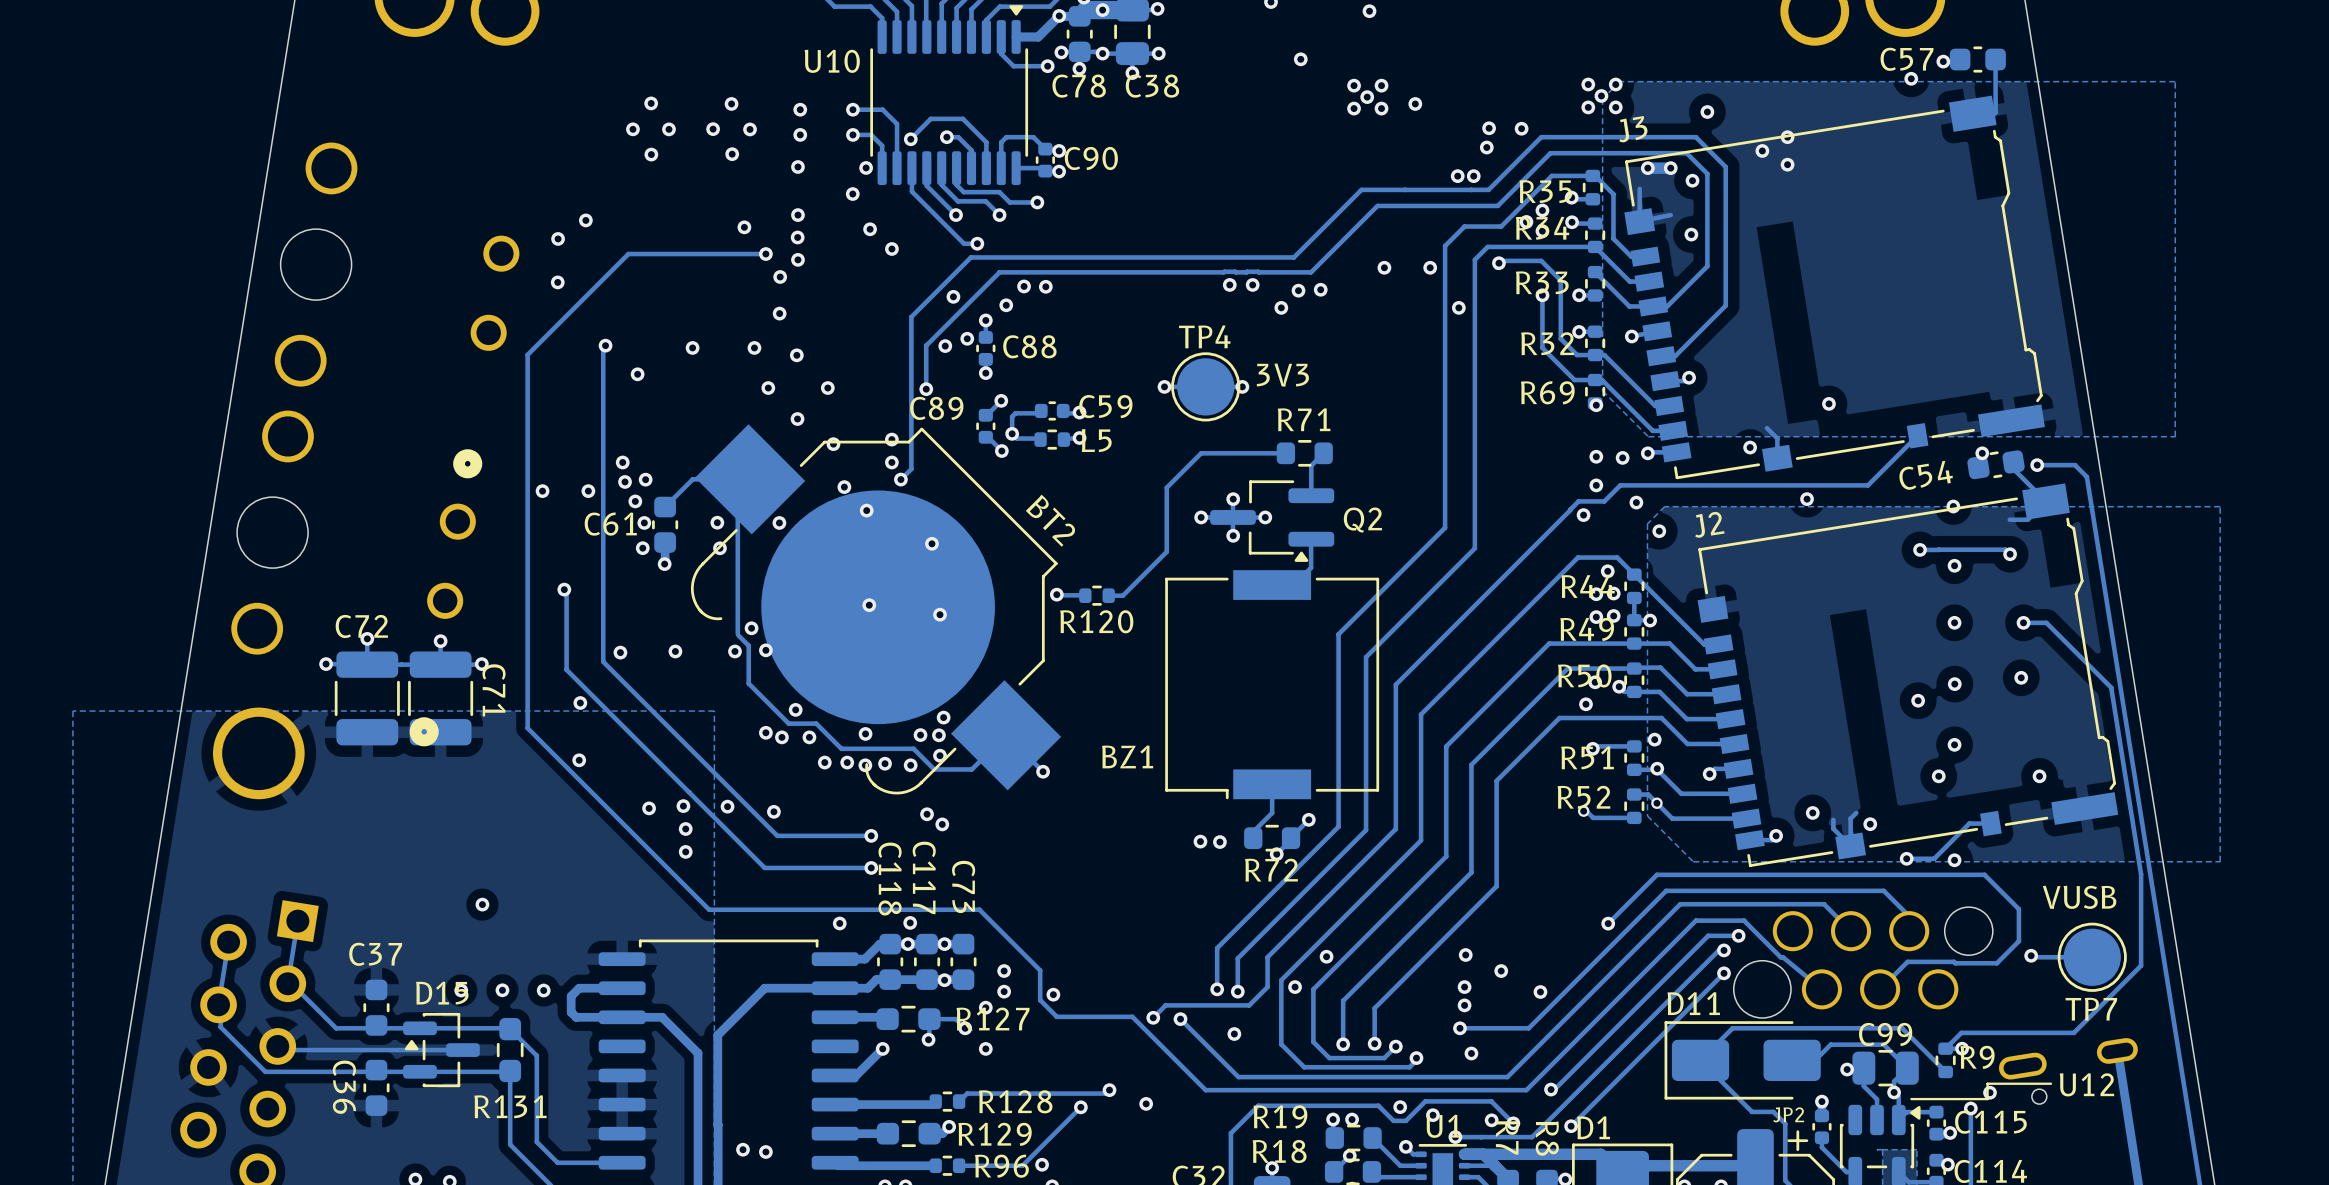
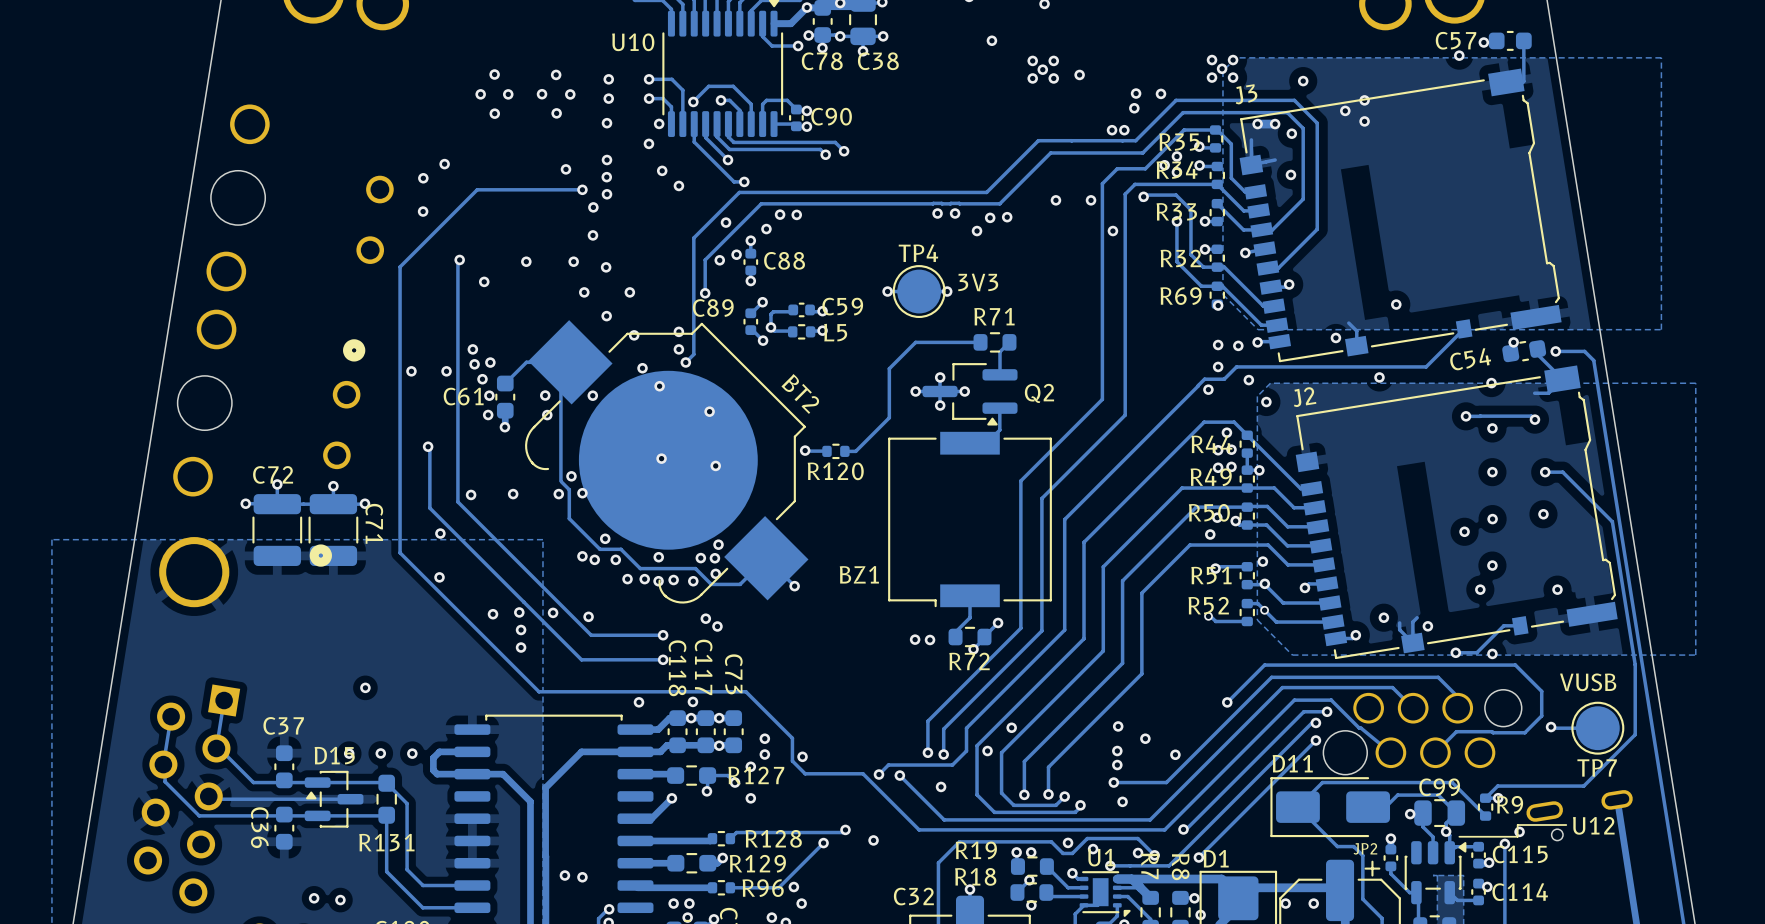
track: (999, 192) (1009, 202) (1037, 202) -> (761, 142) (835, 142) (844, 151)
track: (985, 201) (999, 215) -> (750, 149) (820, 149) (825, 154)
via: (1037, 202) -> none
via: none -> (844, 151)
via: none -> (825, 154)
via: (999, 215) -> none

